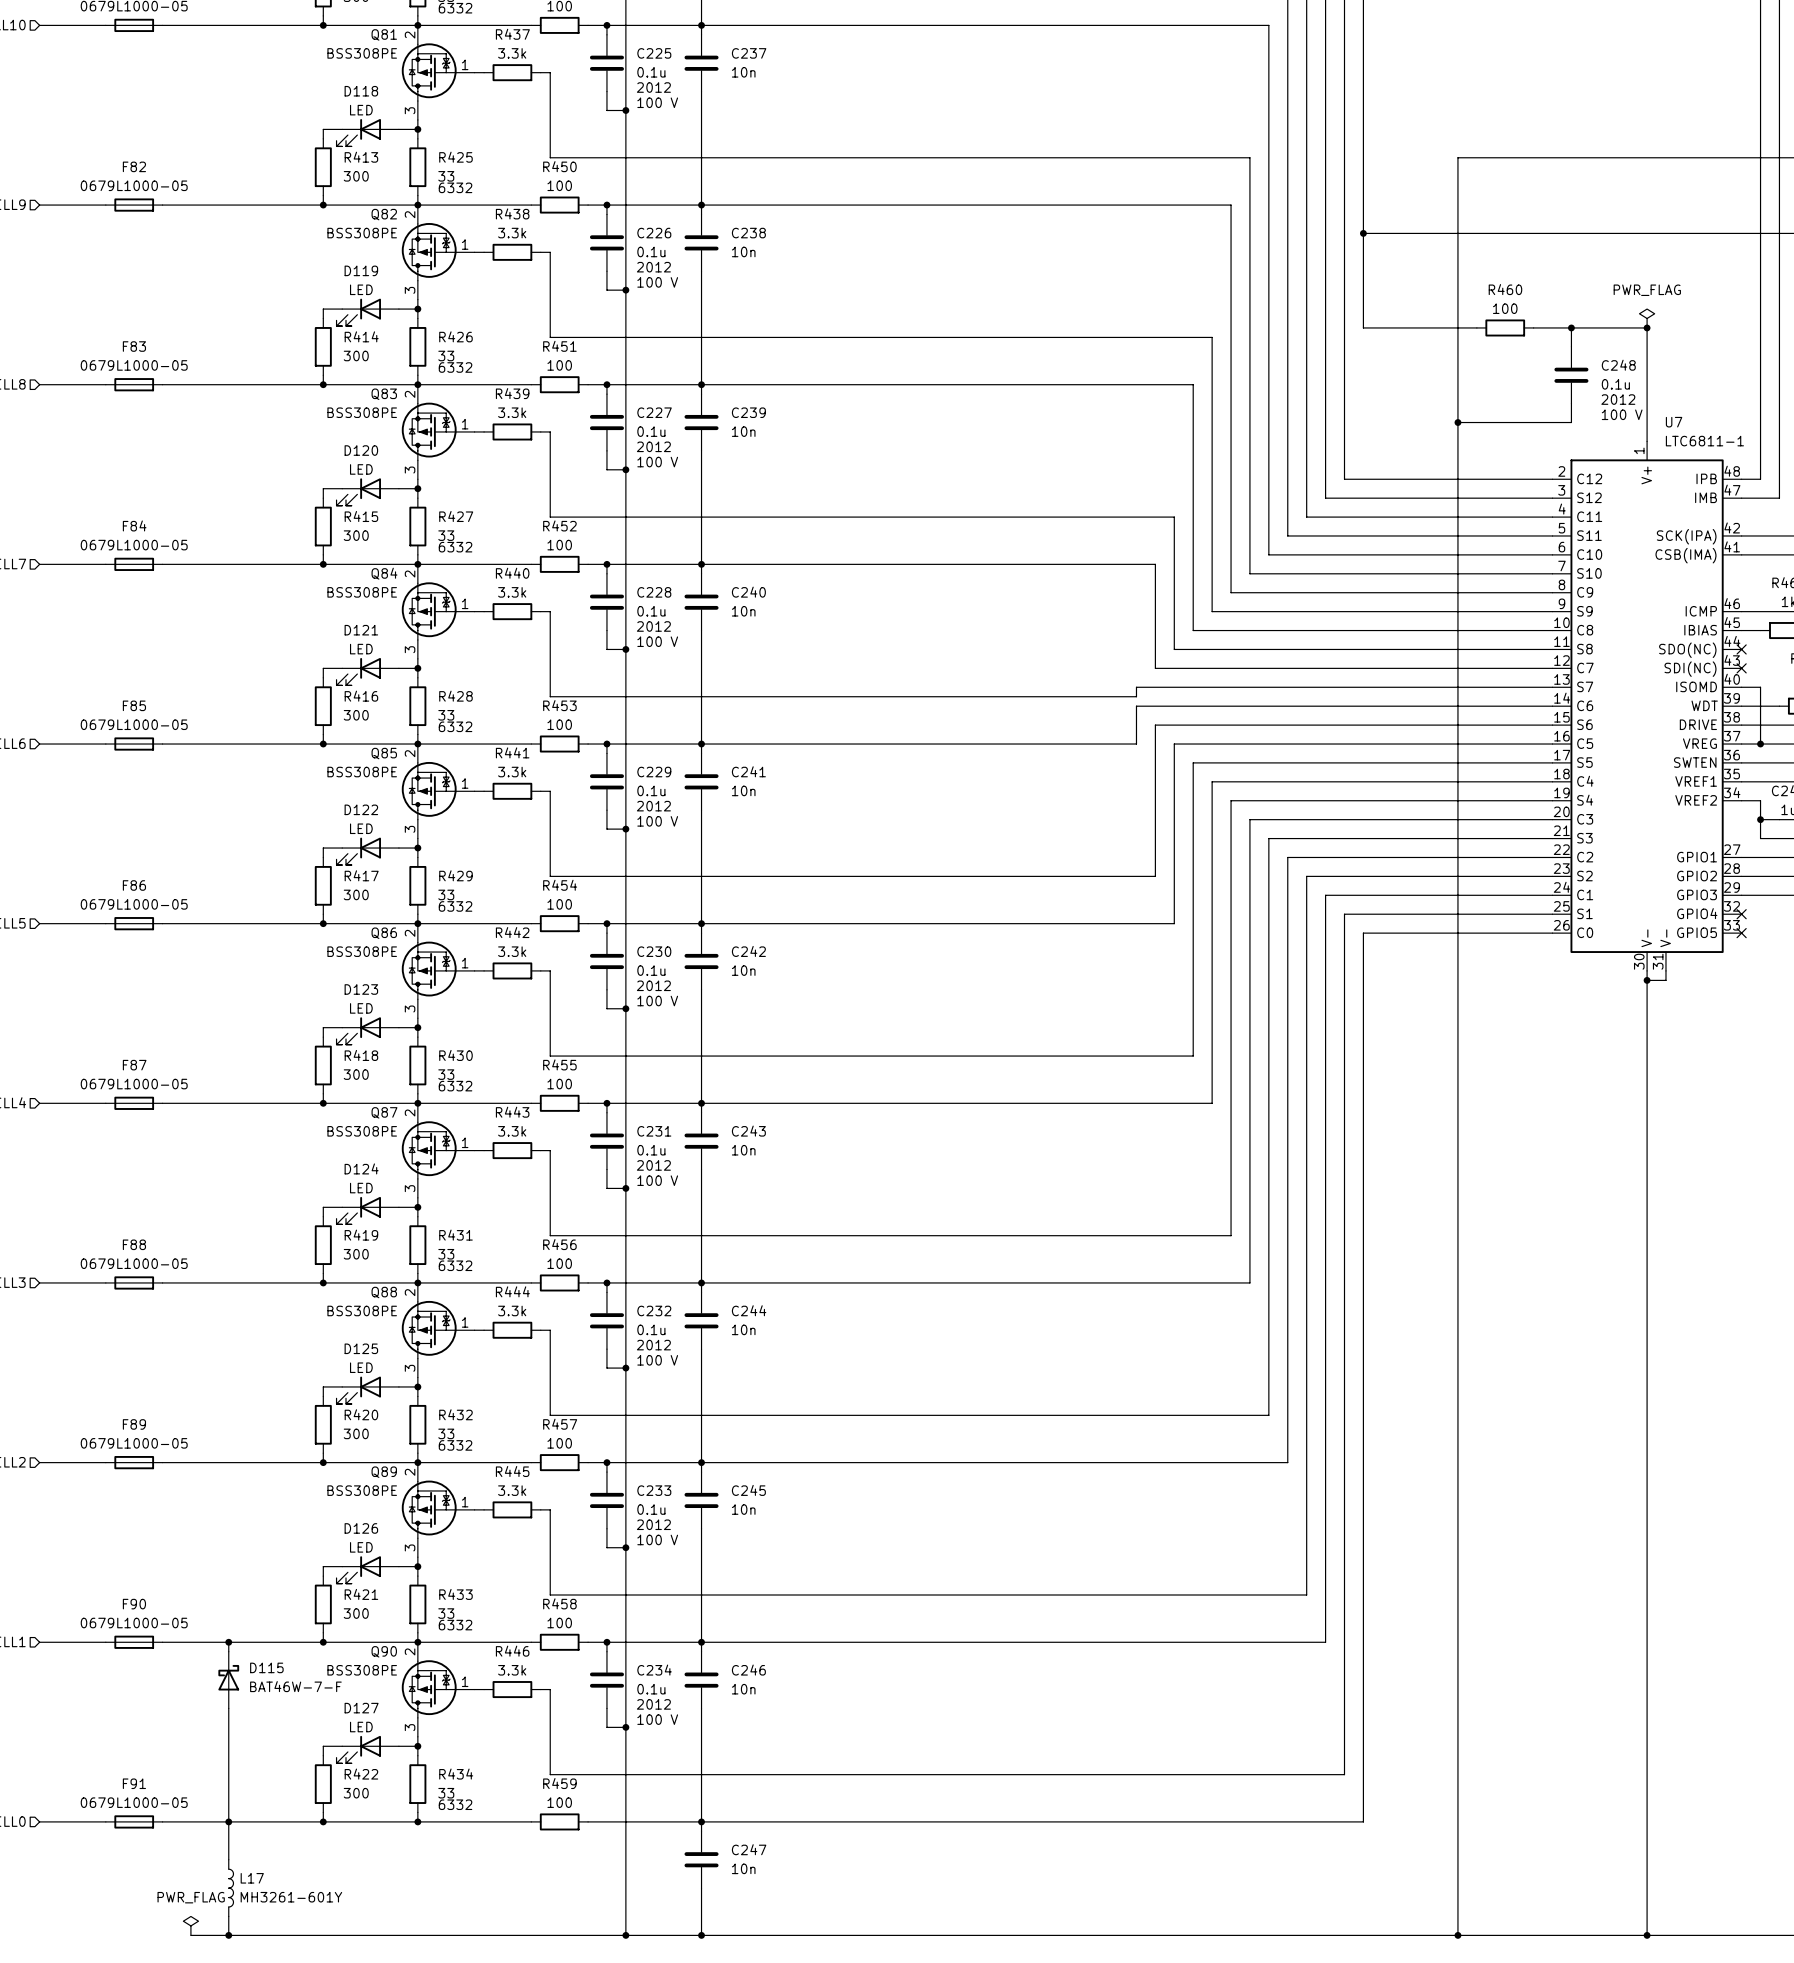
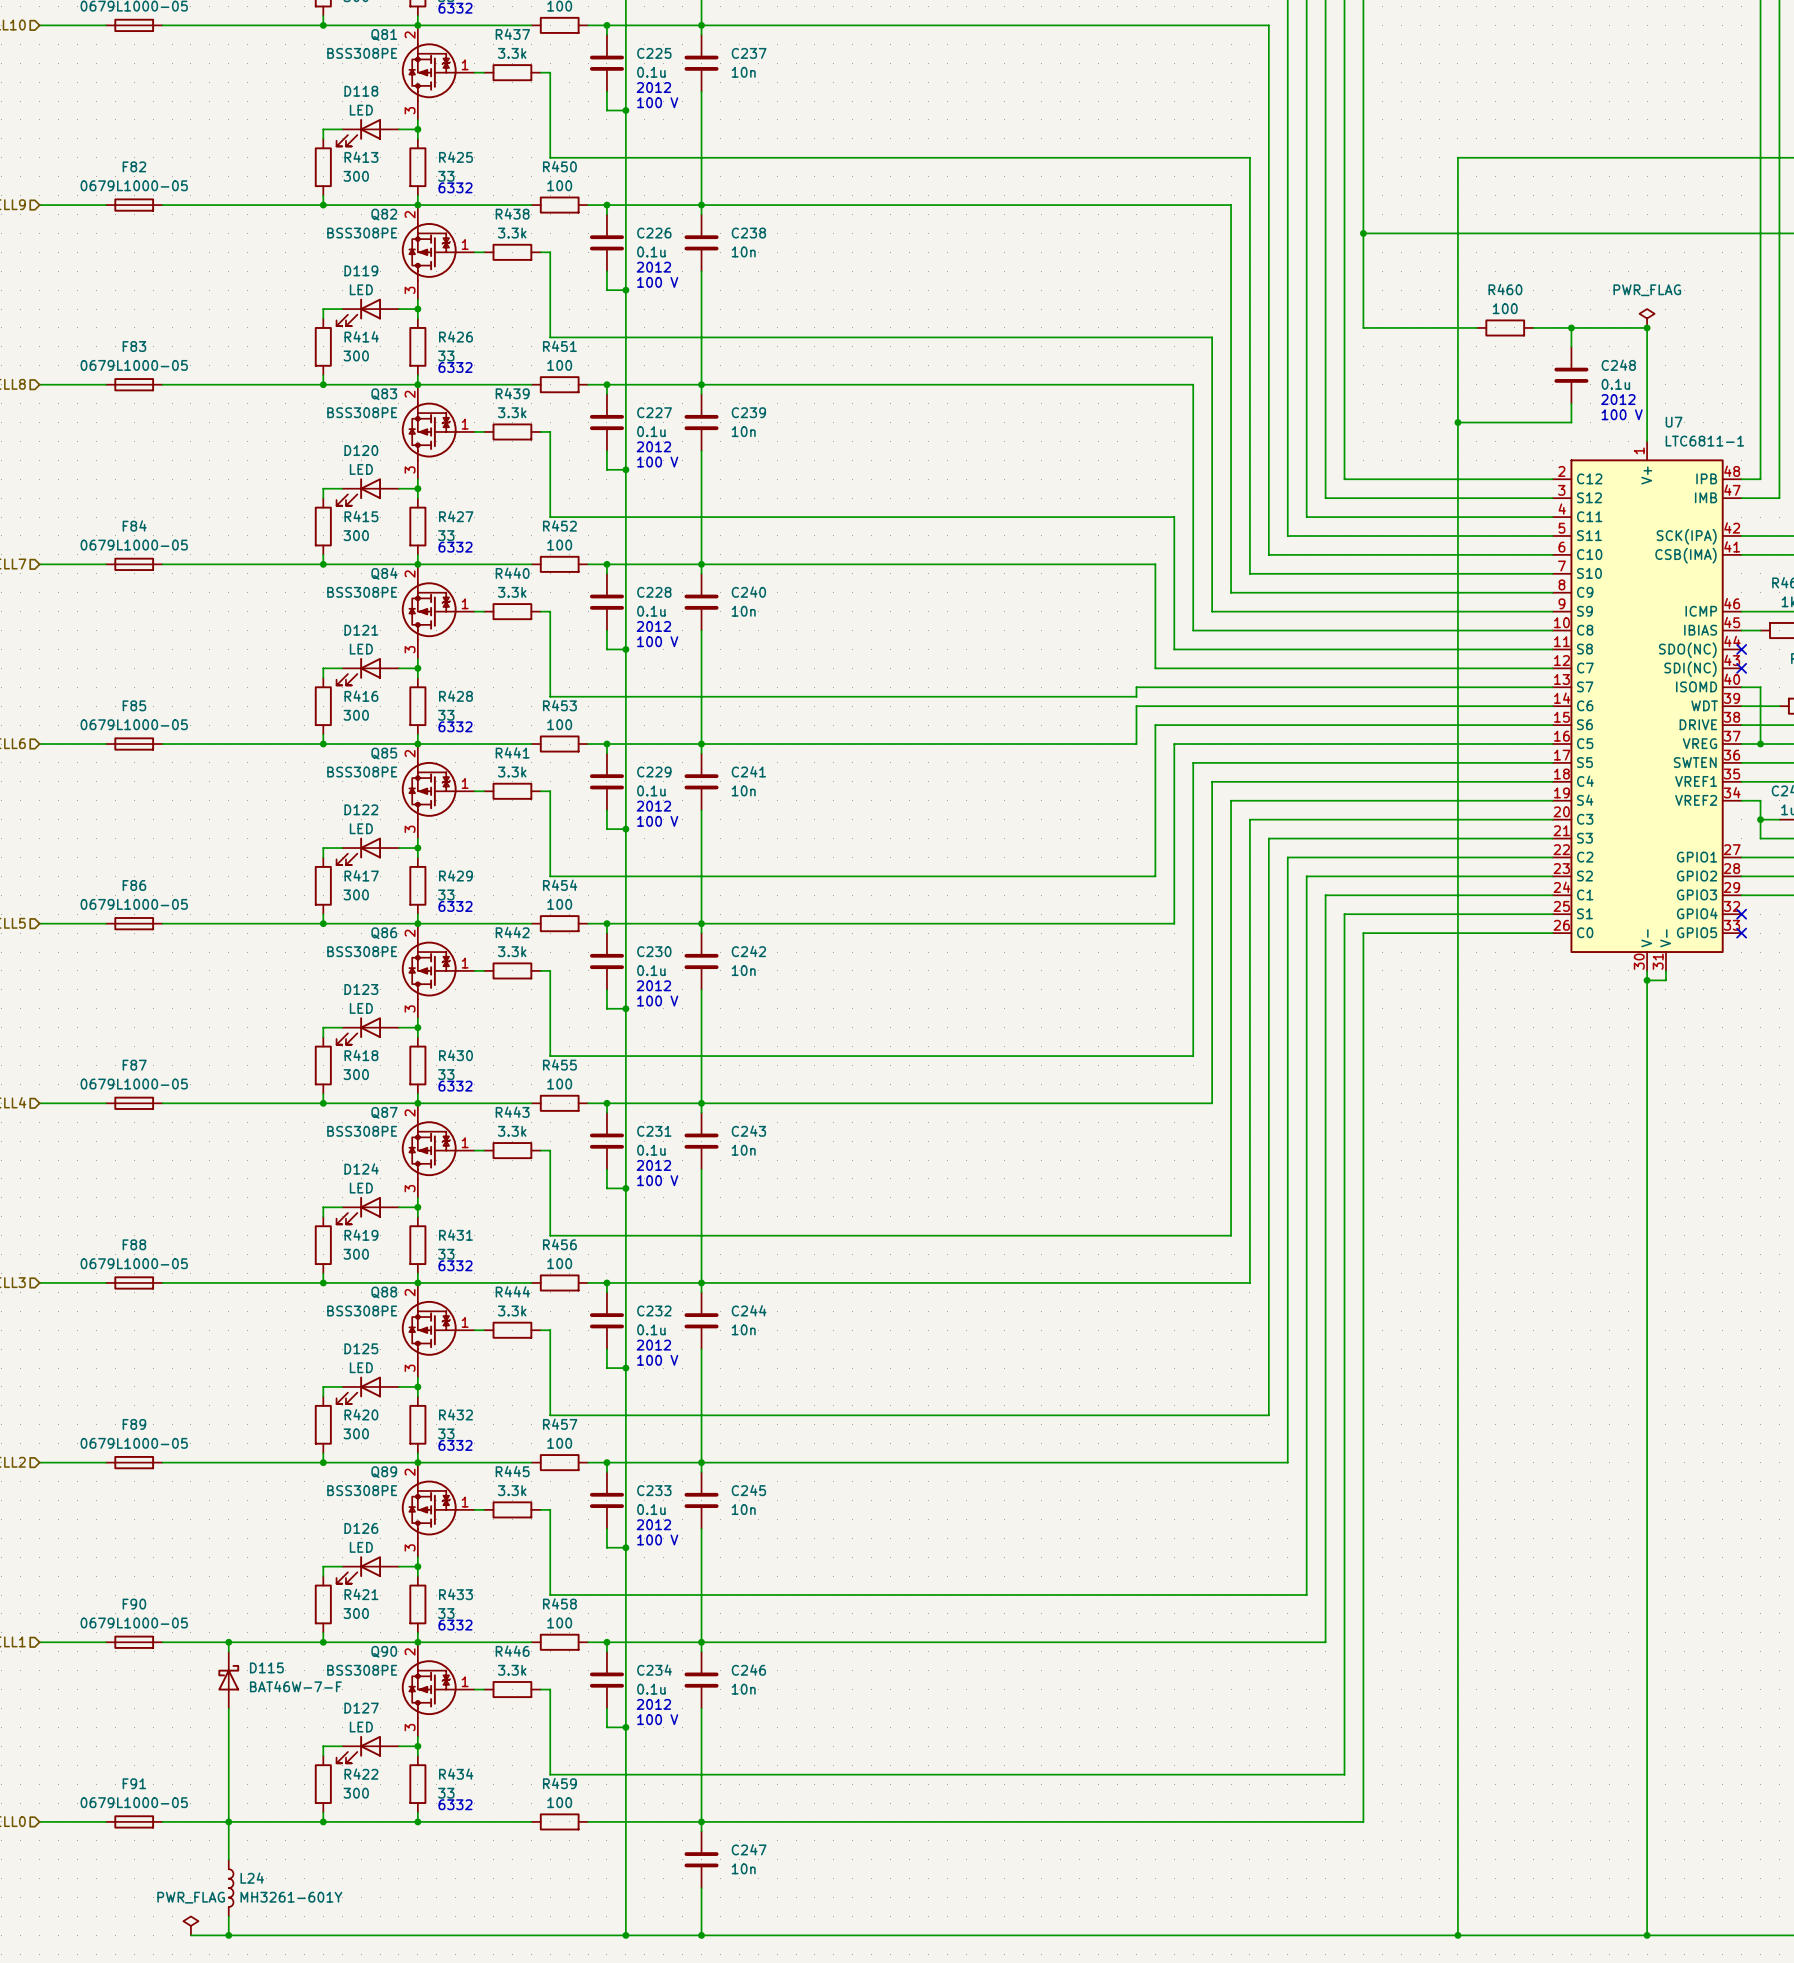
L17 name: L17 (252, 1878) -> L24 (252, 1878)

